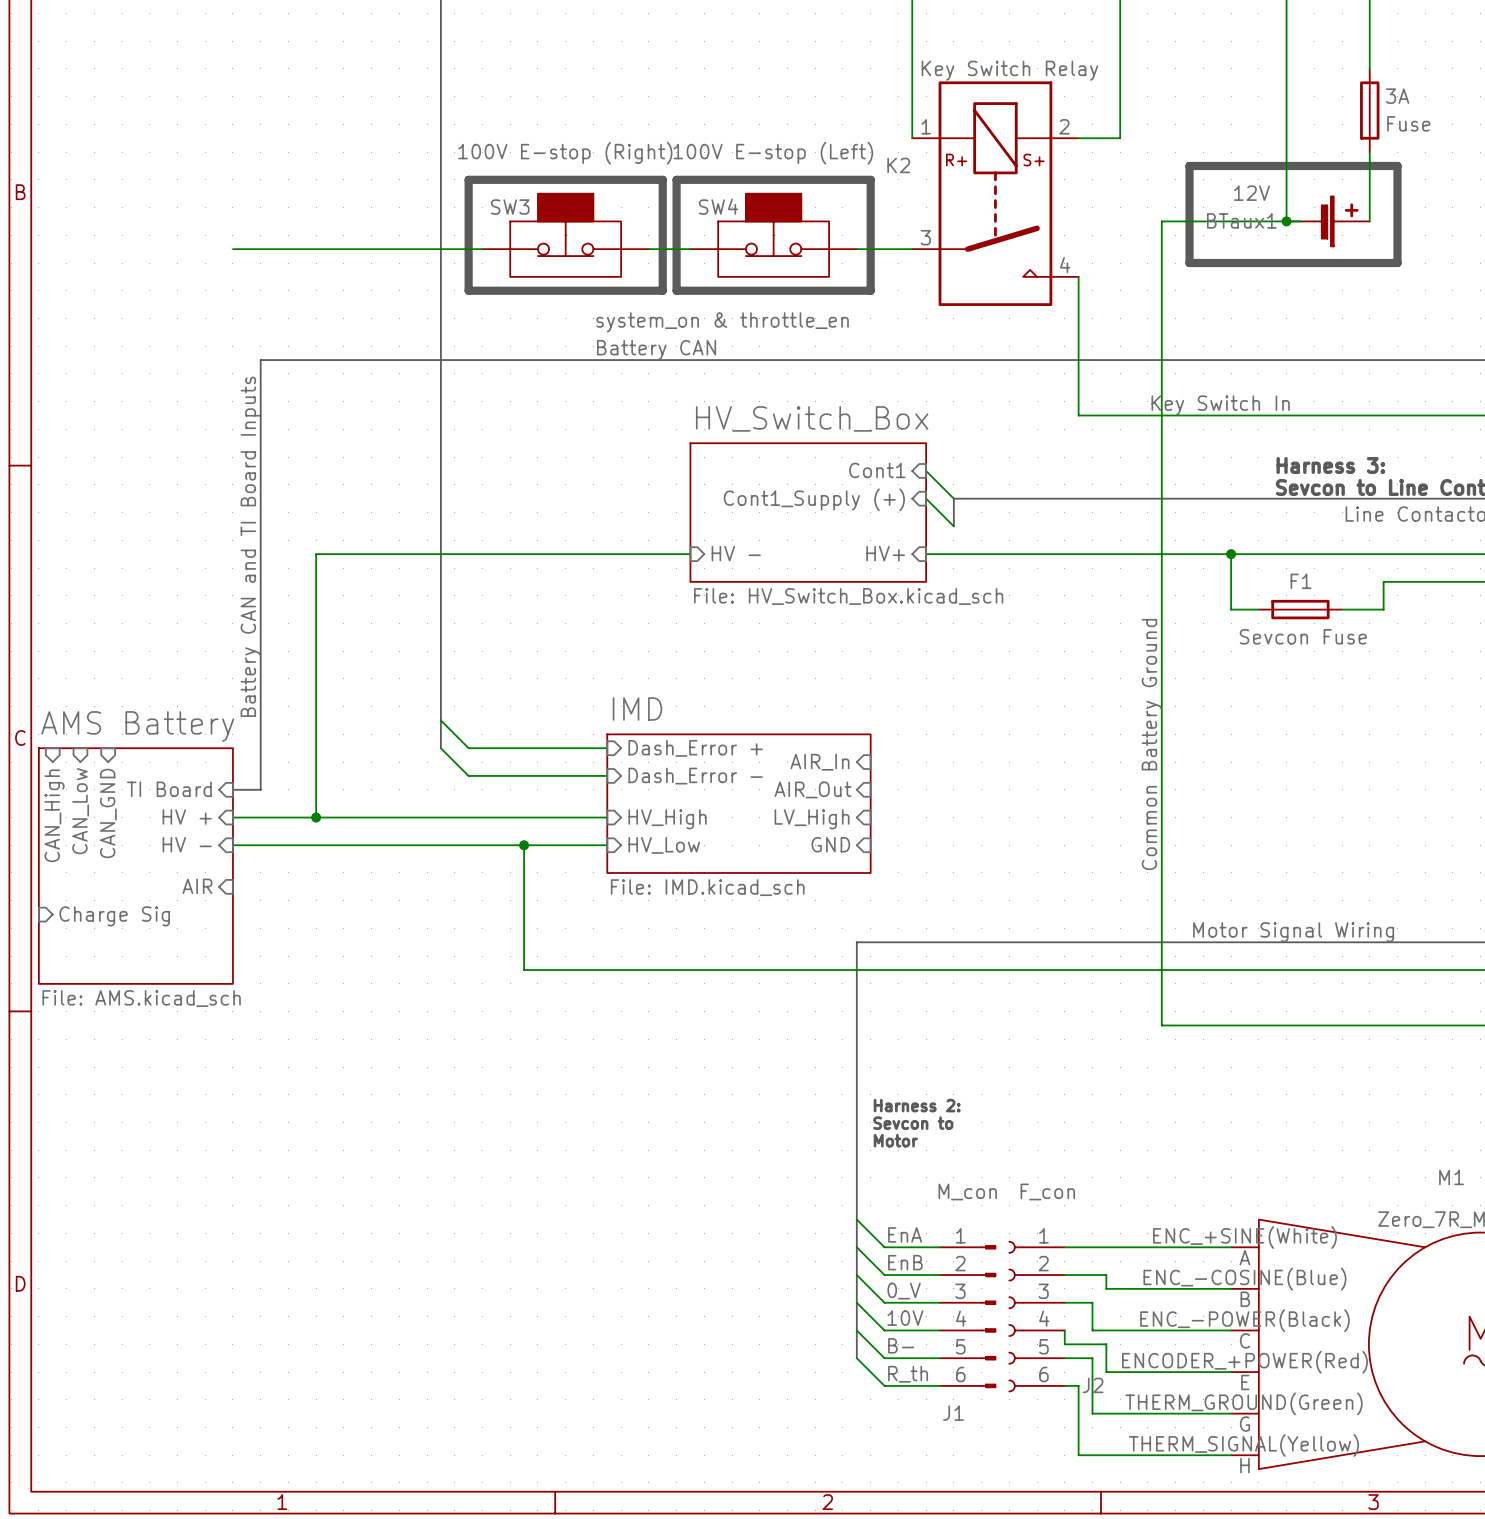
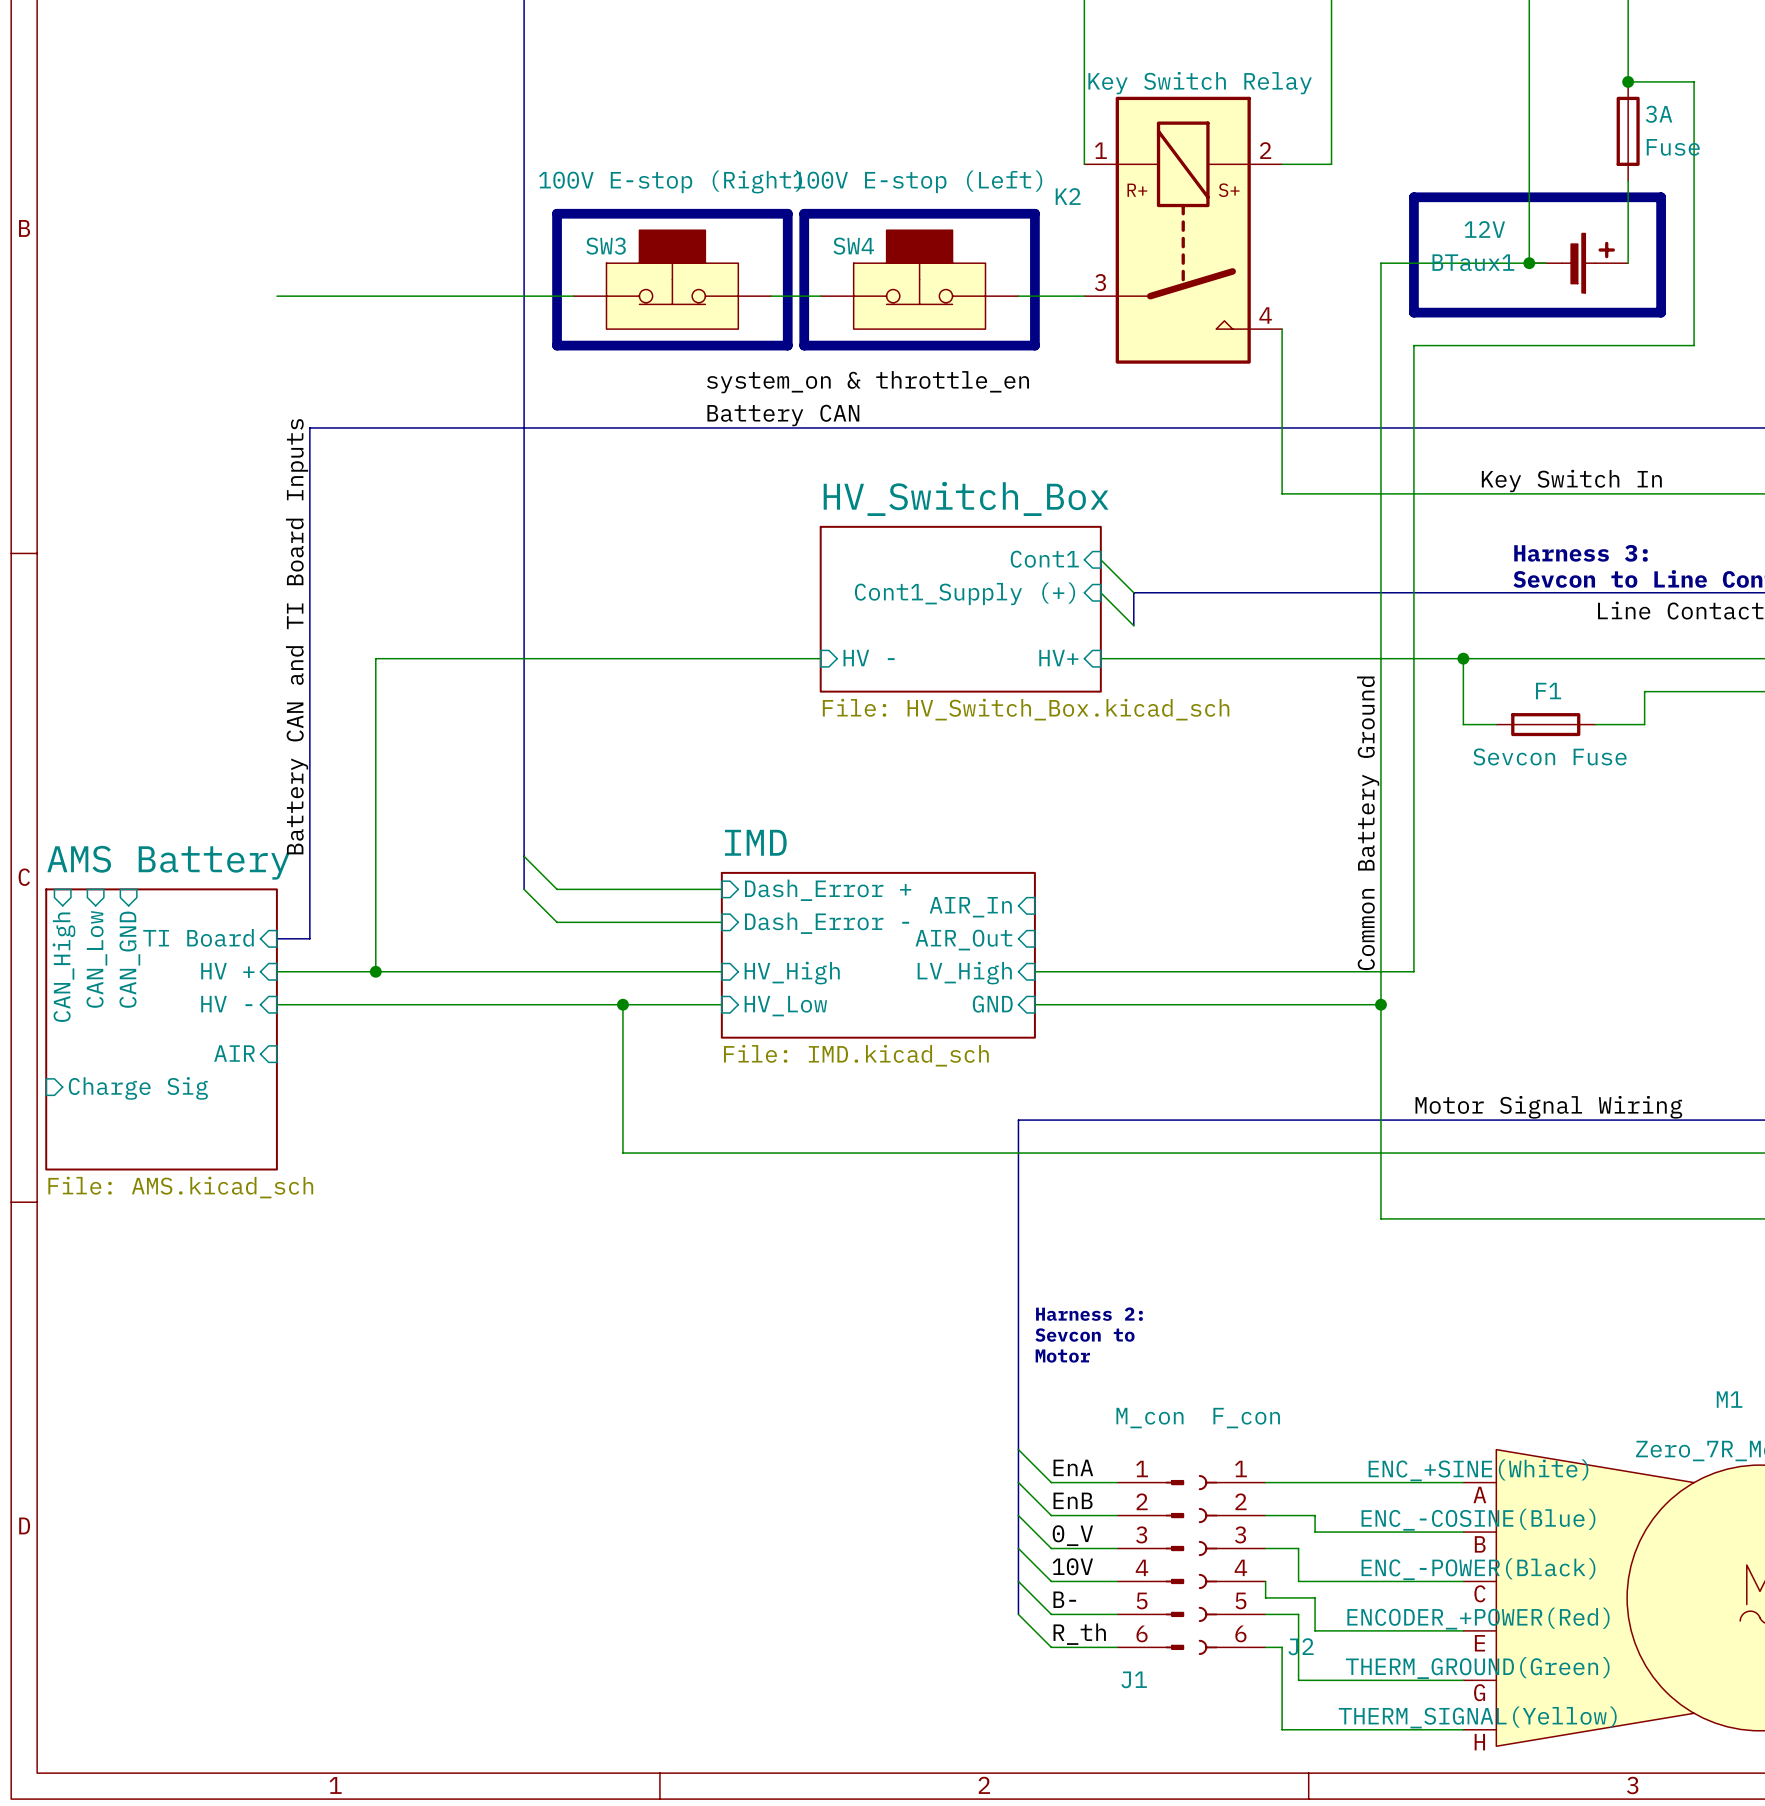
wire: none -> (1628, 81) (1694, 81) (1694, 345) (1413, 345) (1413, 971) (1034, 971)
junction: none -> (1628, 81)
label position: Key Switch In (1220, 405) -> Key Switch In (1571, 480)
label position: Common Battery Ground (1151, 744) -> Common Battery Ground (1368, 823)
wire: none -> (1034, 1004) (1380, 1004)
junction: none -> (1380, 1004)

